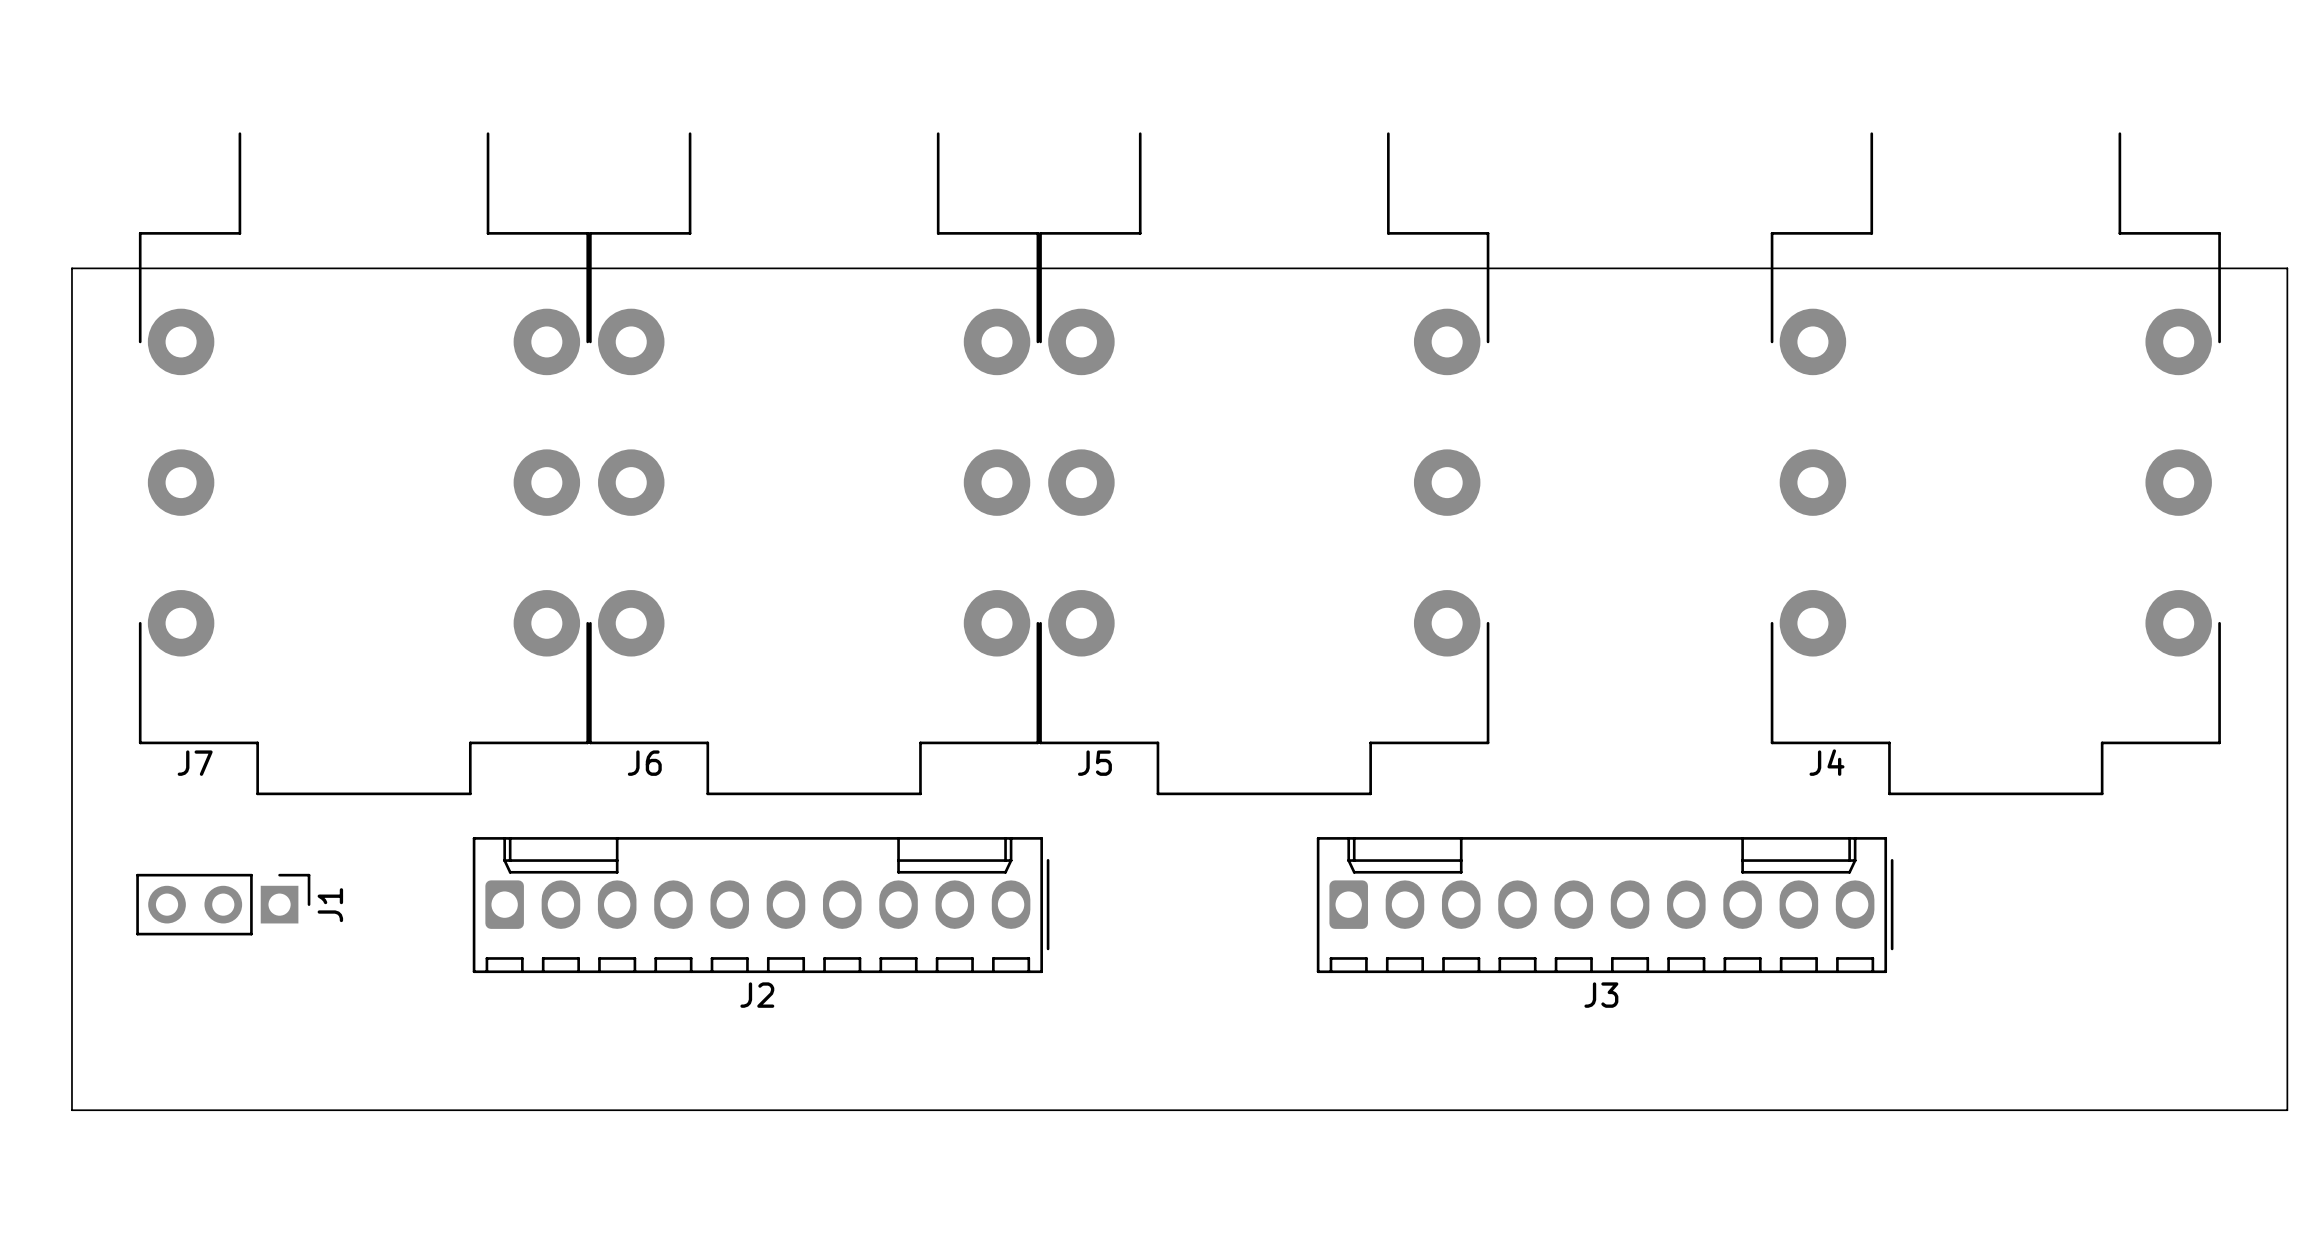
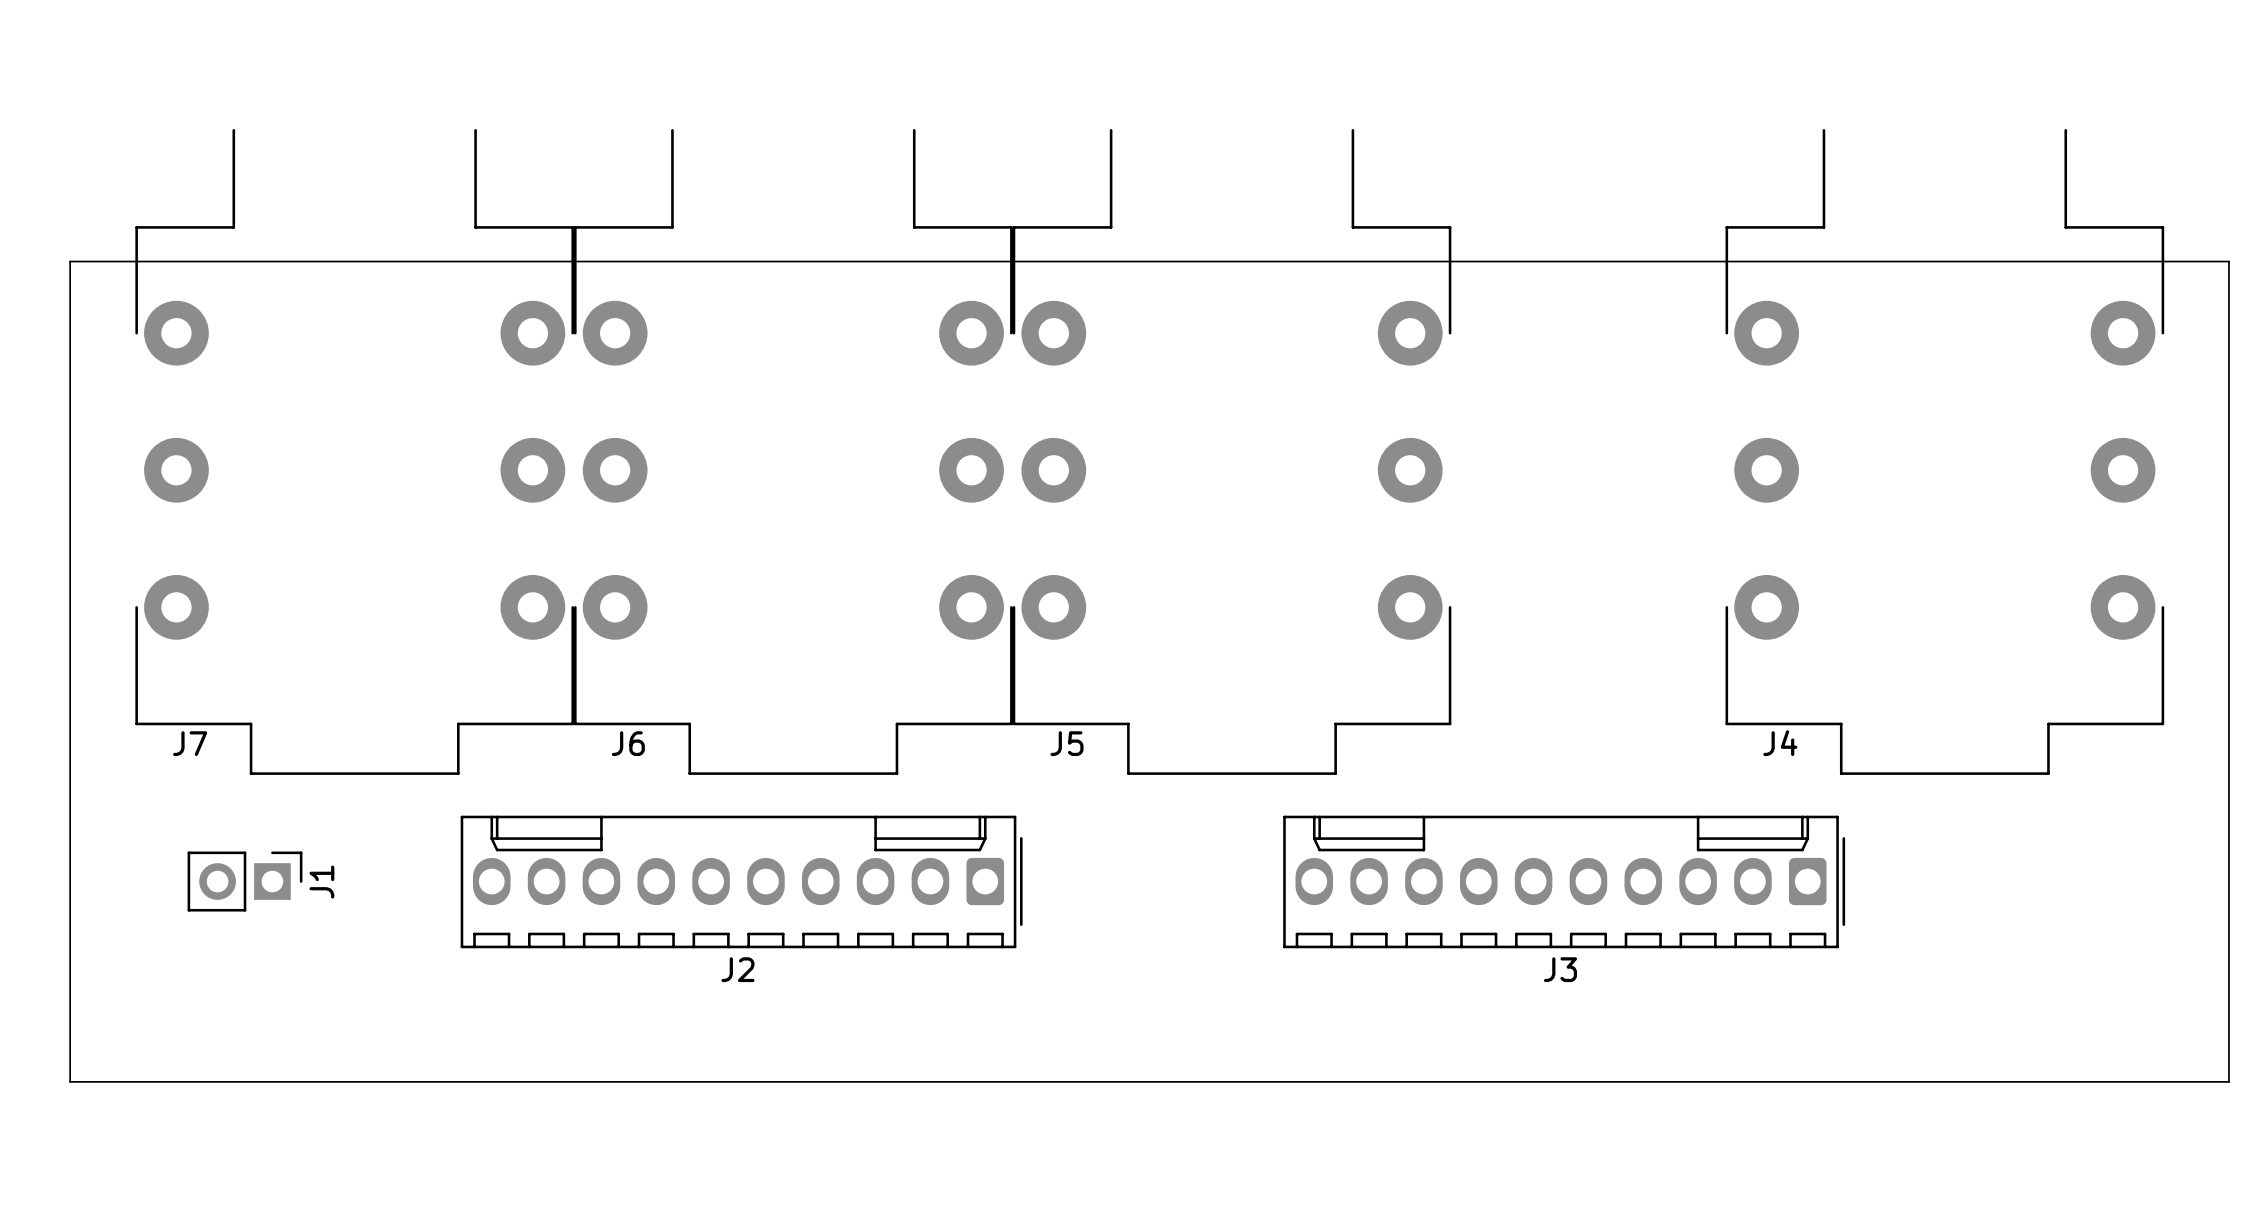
J2 footprint: [472, 837, 1050, 974] -> [460, 815, 1023, 949]
J3 footprint: [1316, 837, 1894, 974] -> [1283, 815, 1846, 949]
J1 footprint: [136, 873, 311, 936] -> [187, 851, 303, 912]

